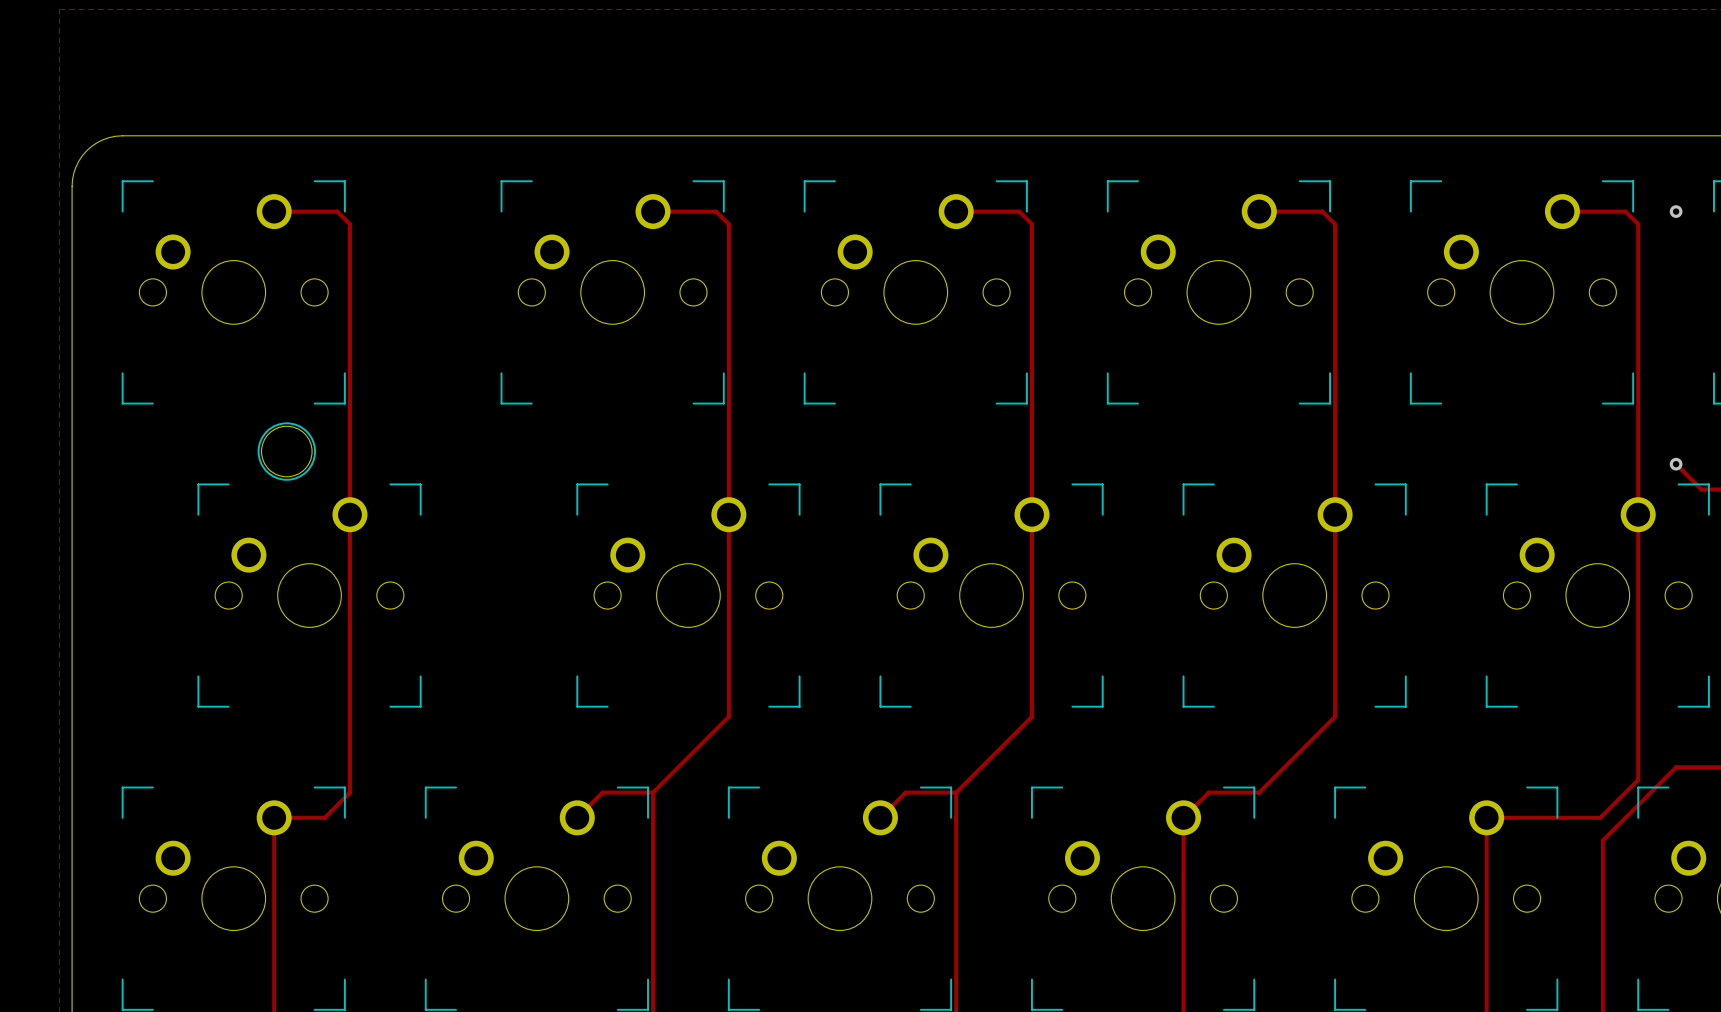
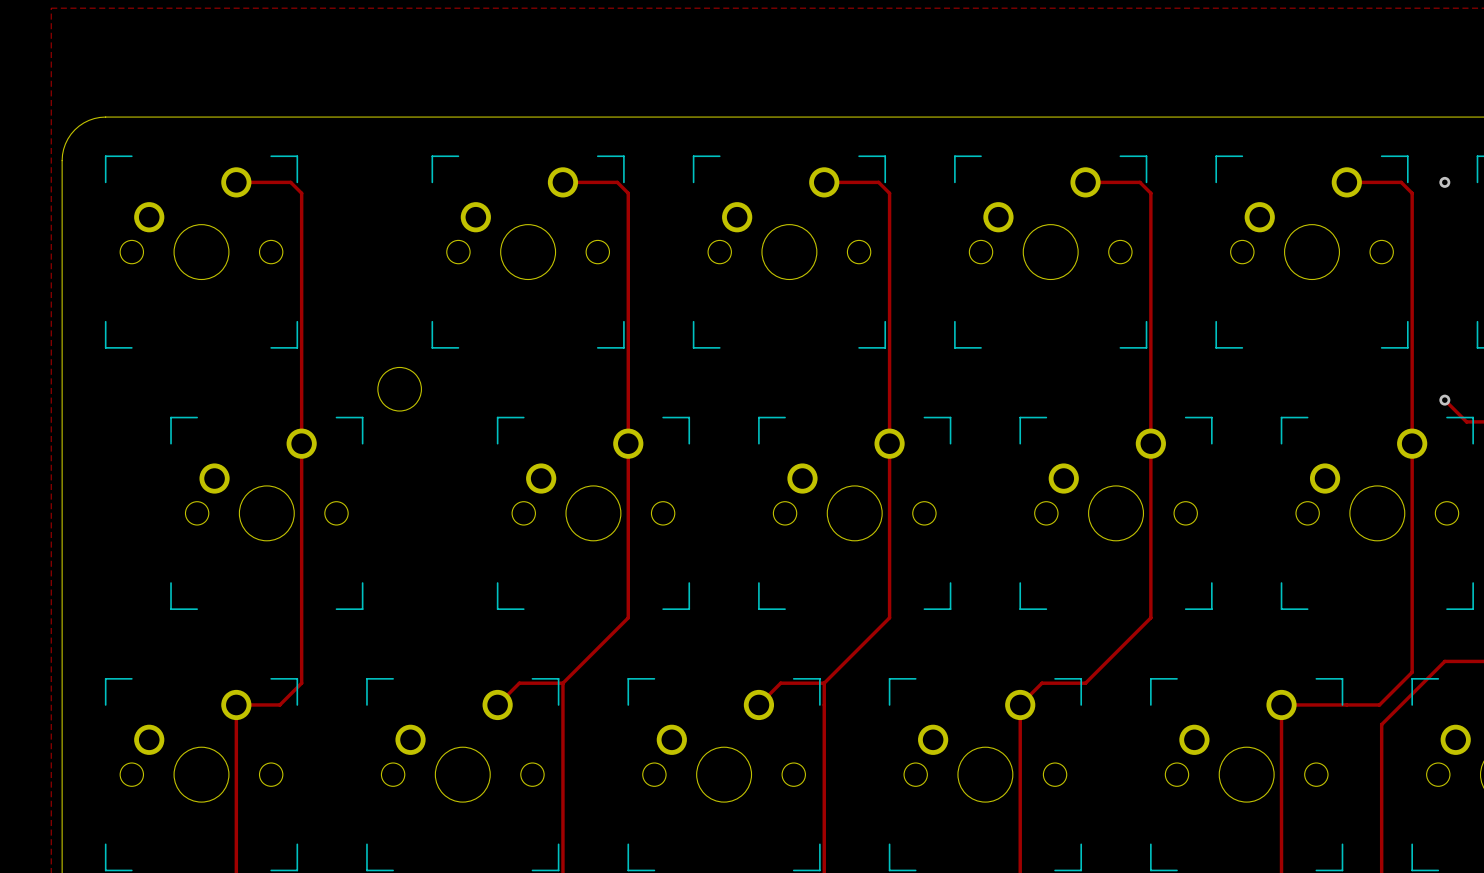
drawing: [257, 422, 316, 481] -> none
round board edge position: (286, 451) -> (399, 389)

